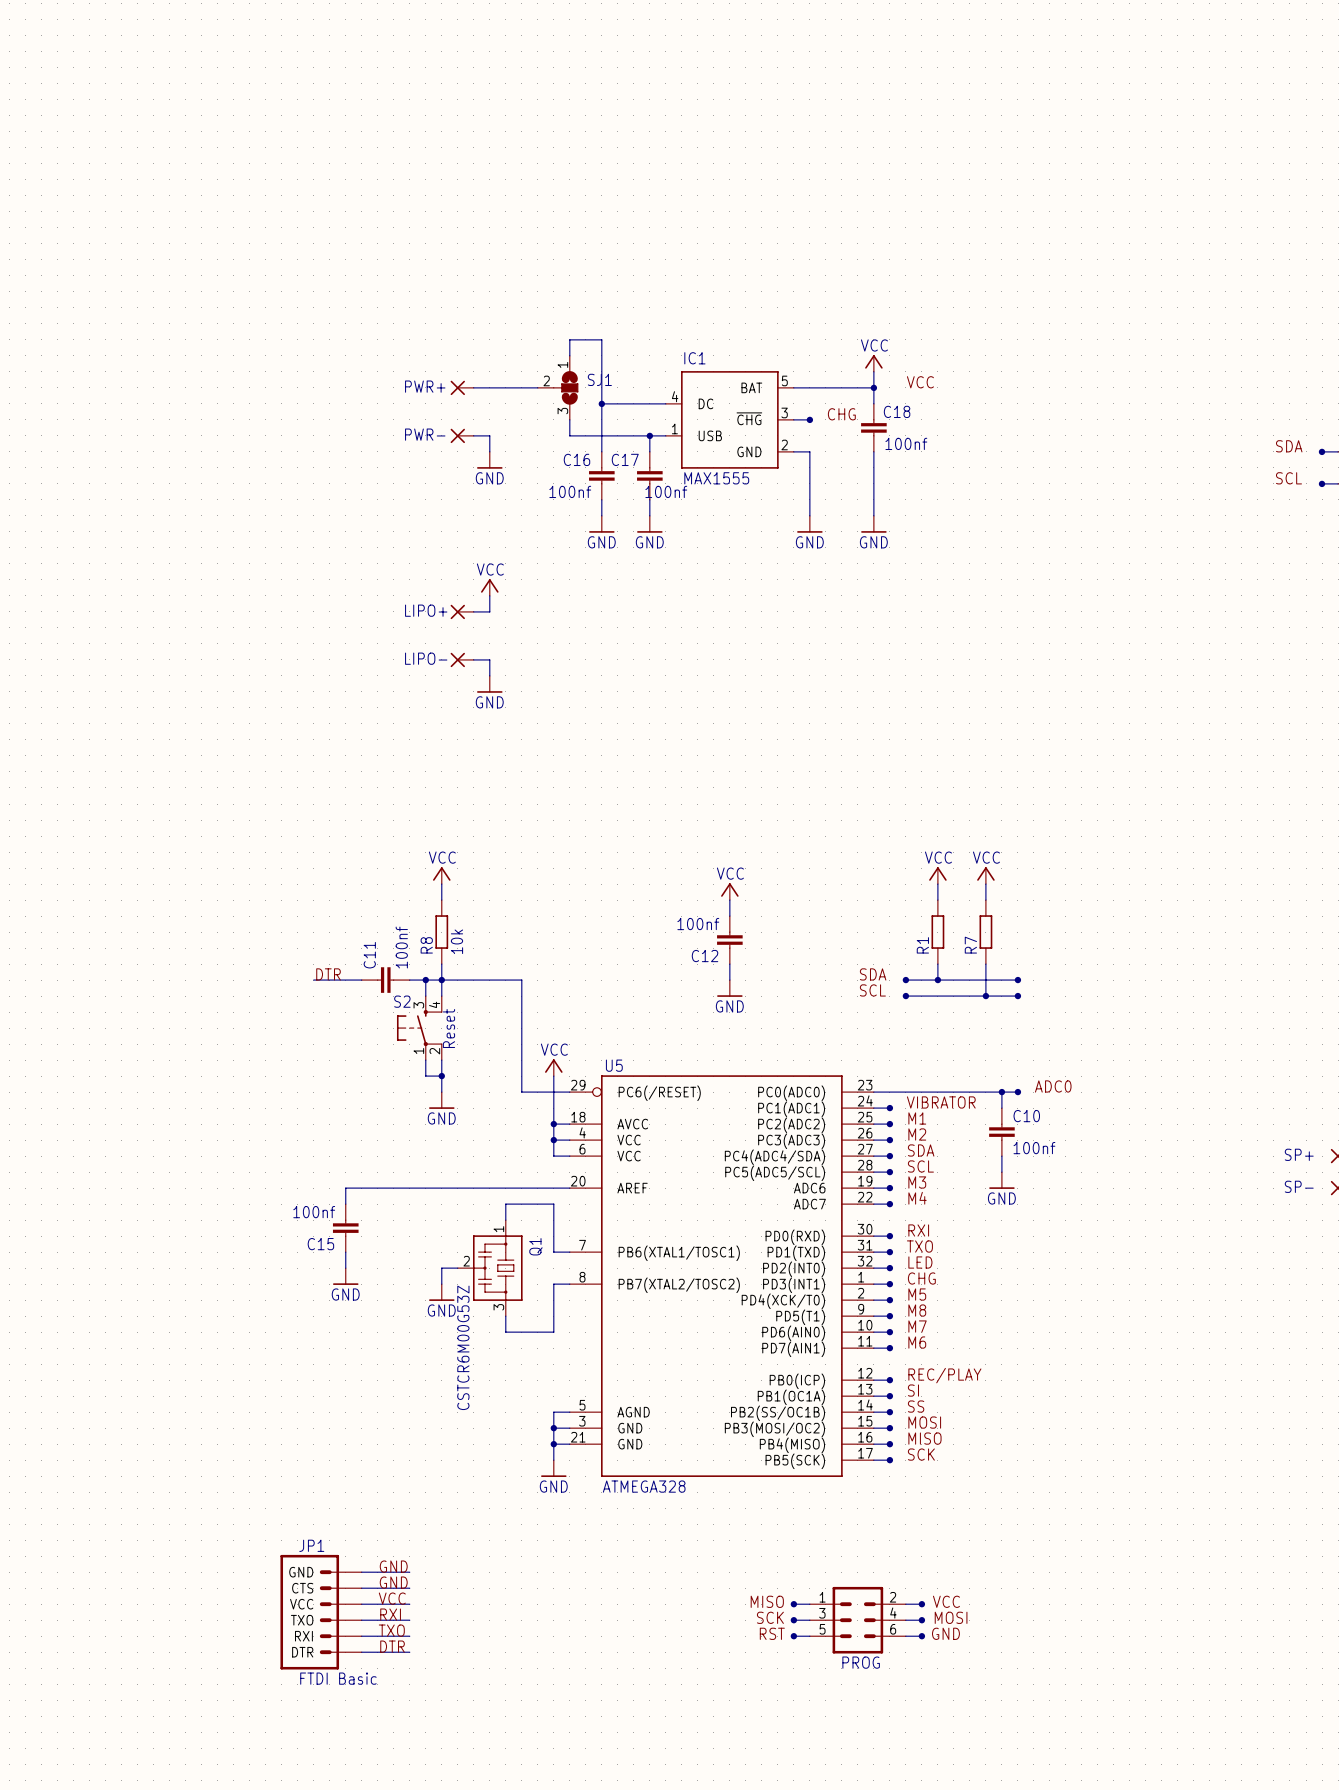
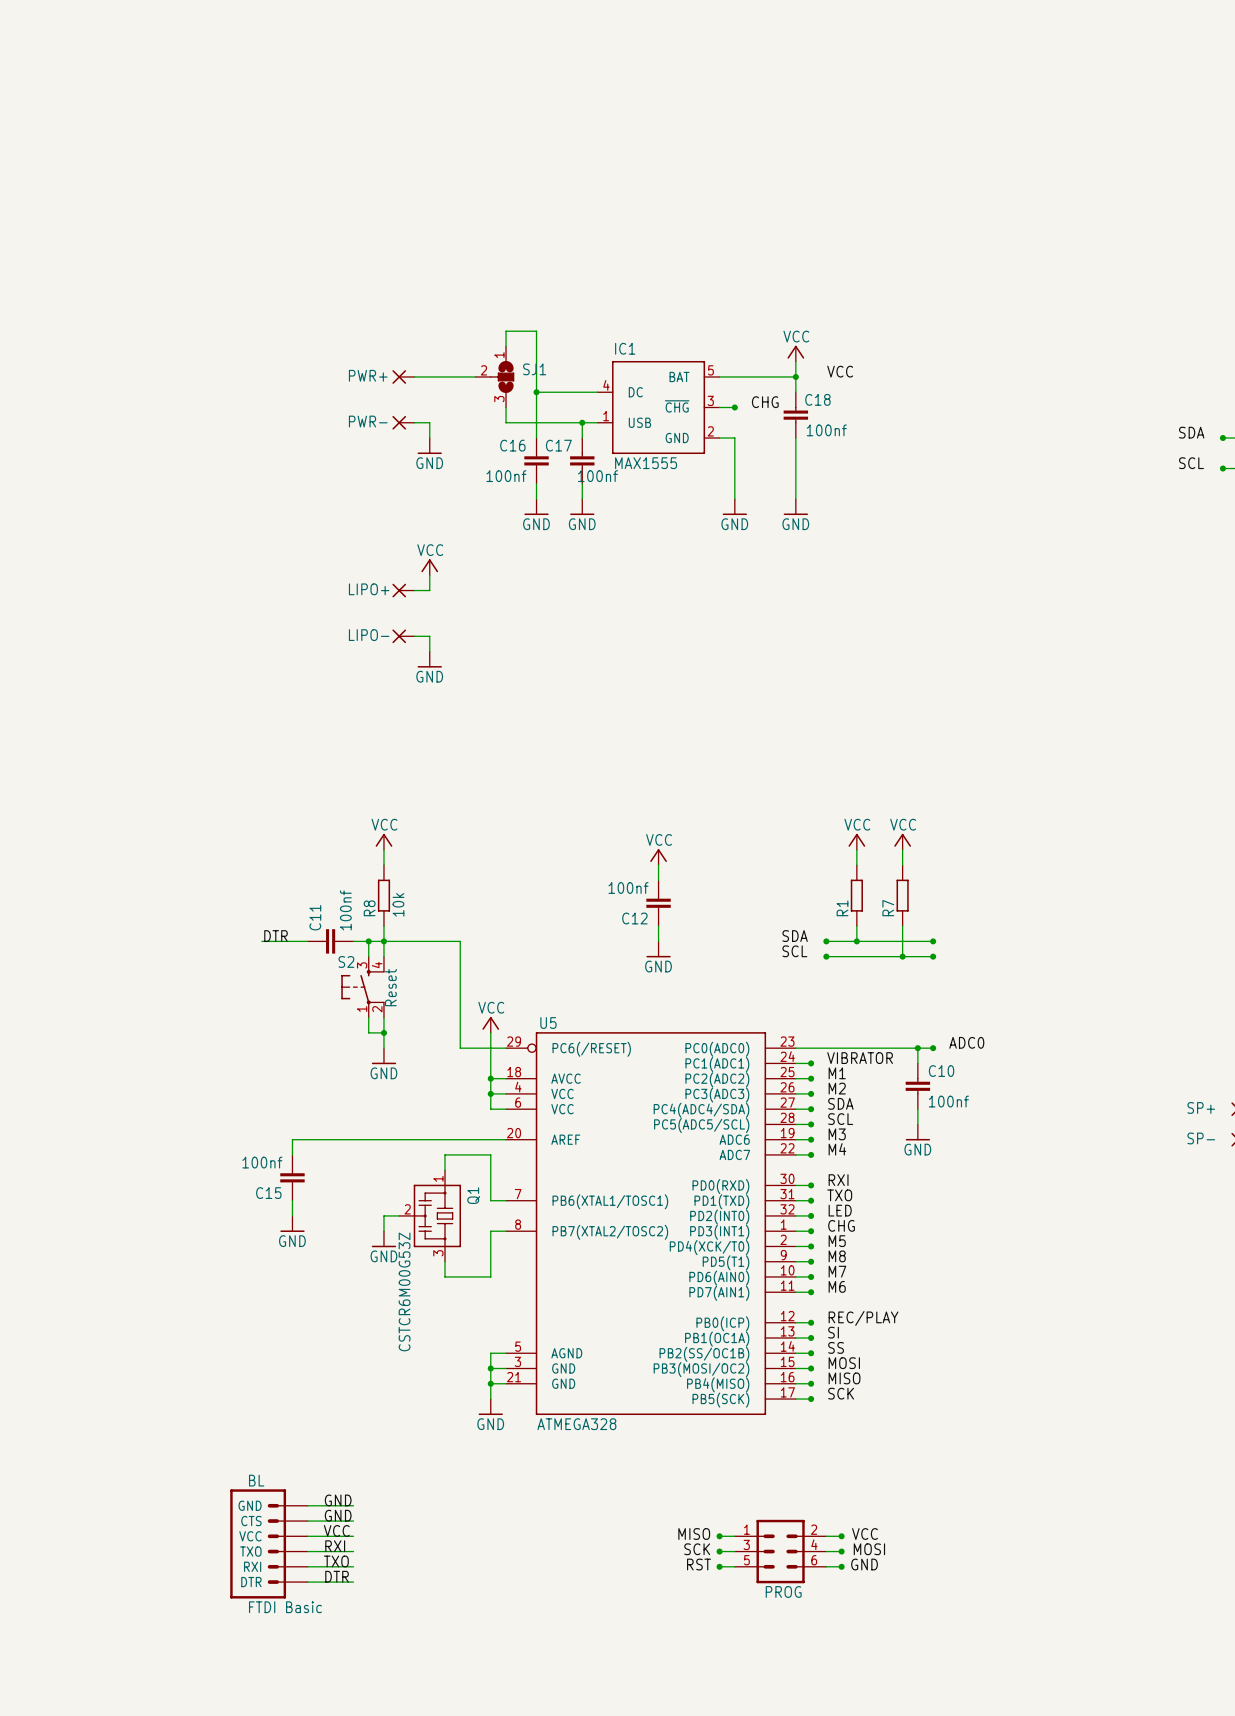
JP1 name: JP1 (311, 1545) -> BL (256, 1480)

